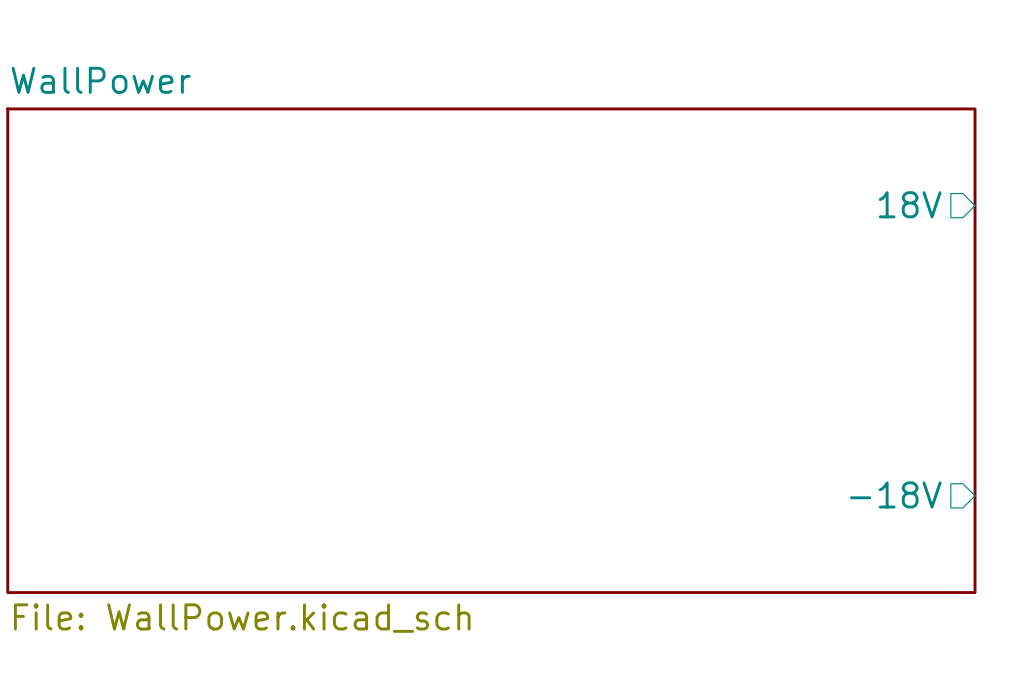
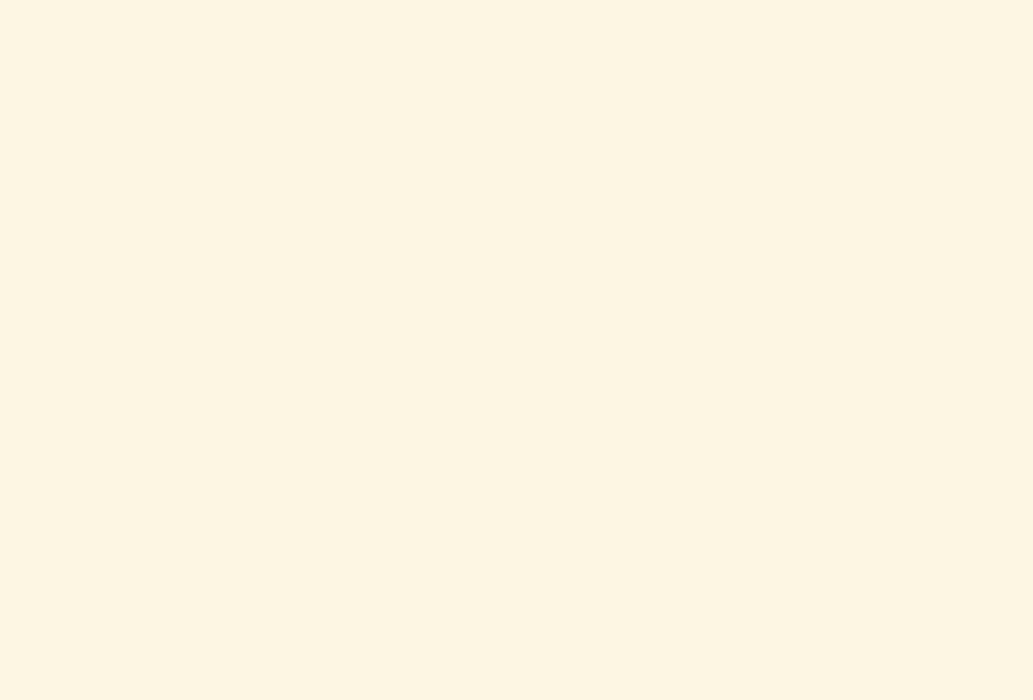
sheet pin: 18V (910, 204) -> none
sheet WallPower: File: WallPower.kicad_sch (491, 350) -> none
sheet pin: -18V (895, 494) -> none

